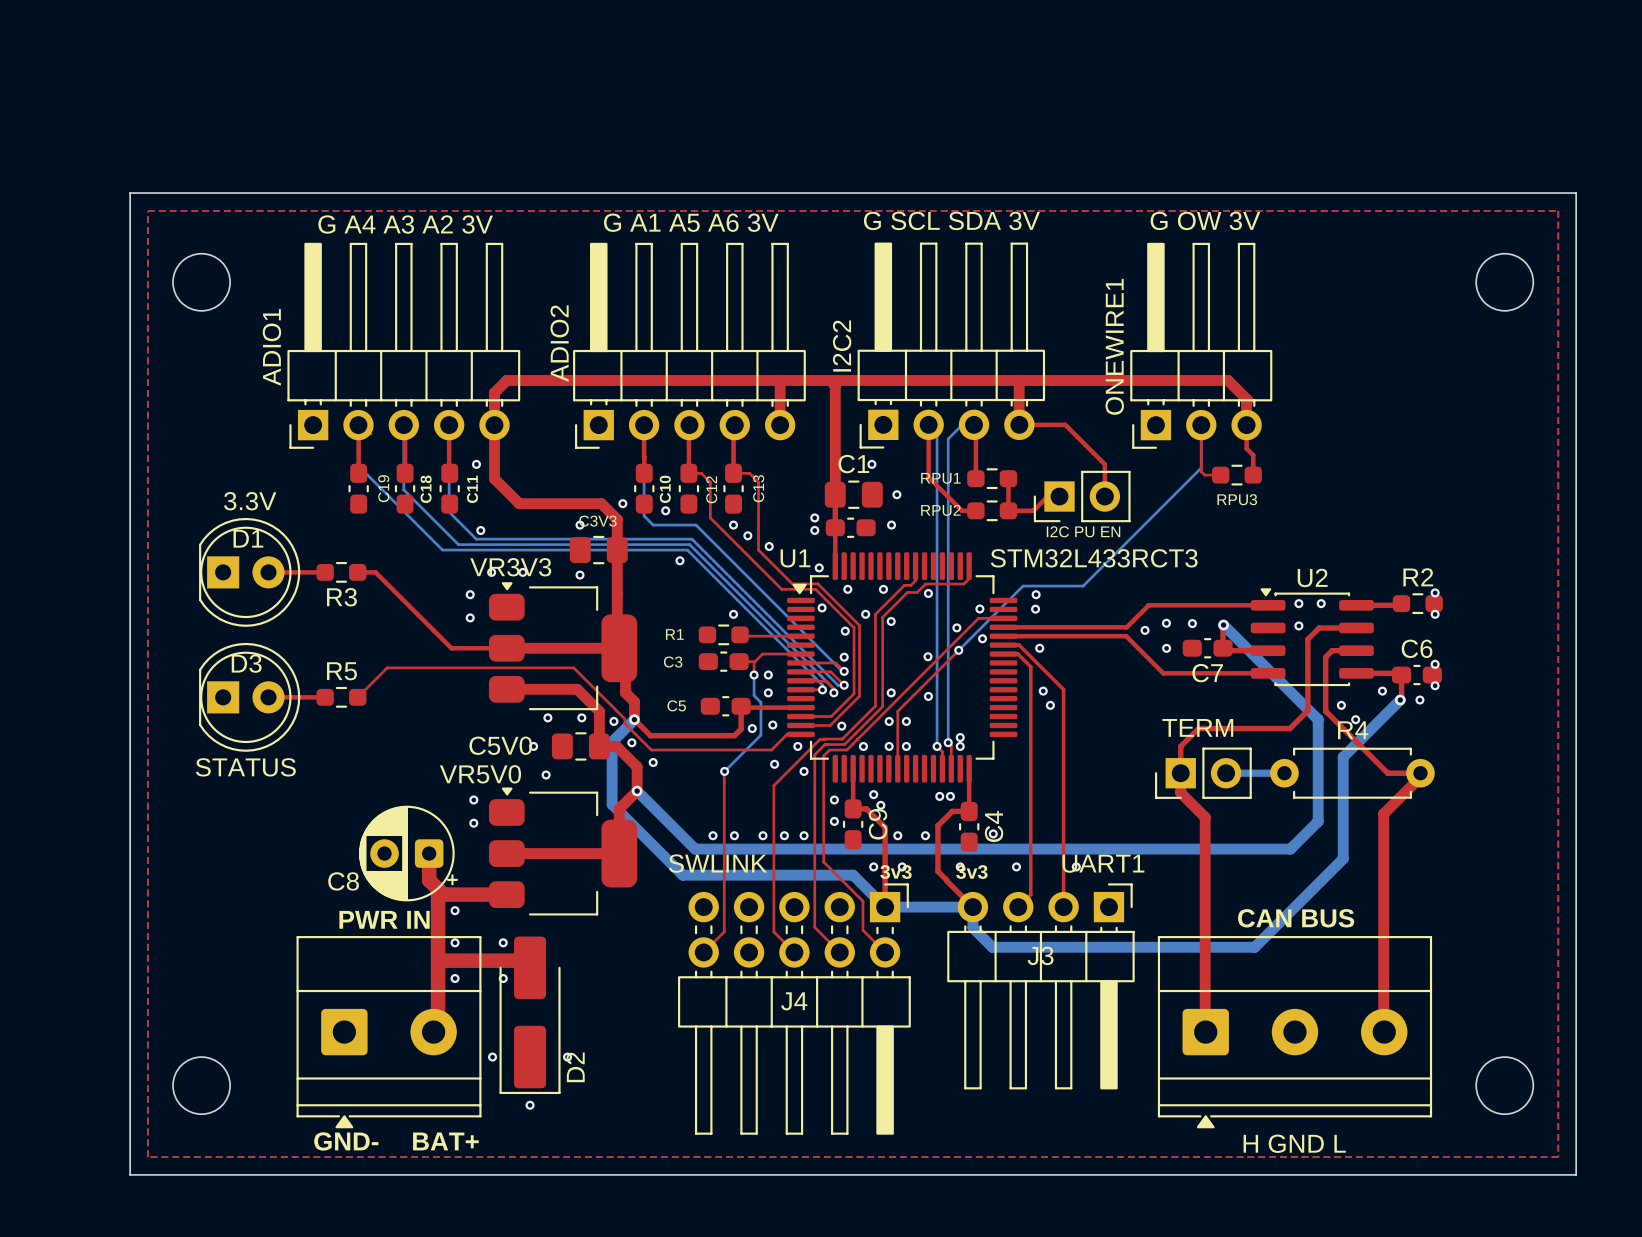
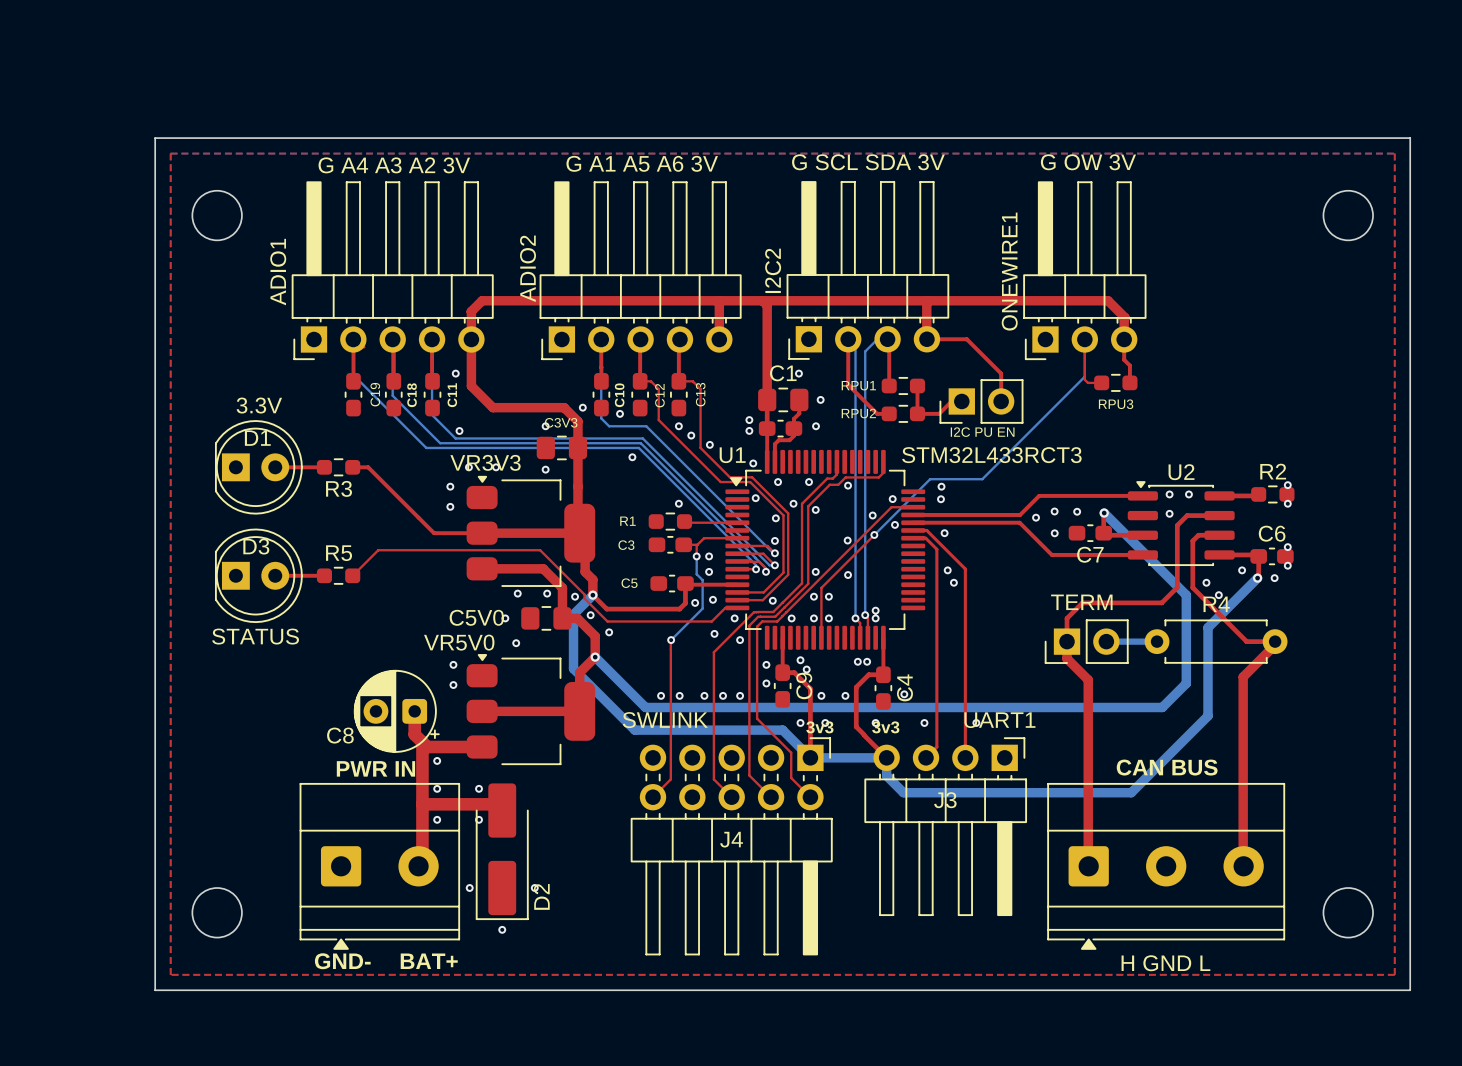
top track: none -> (799, 399) (799, 413) (793, 418) (793, 435) (789, 440) (778, 440) (774, 444) (774, 461)

